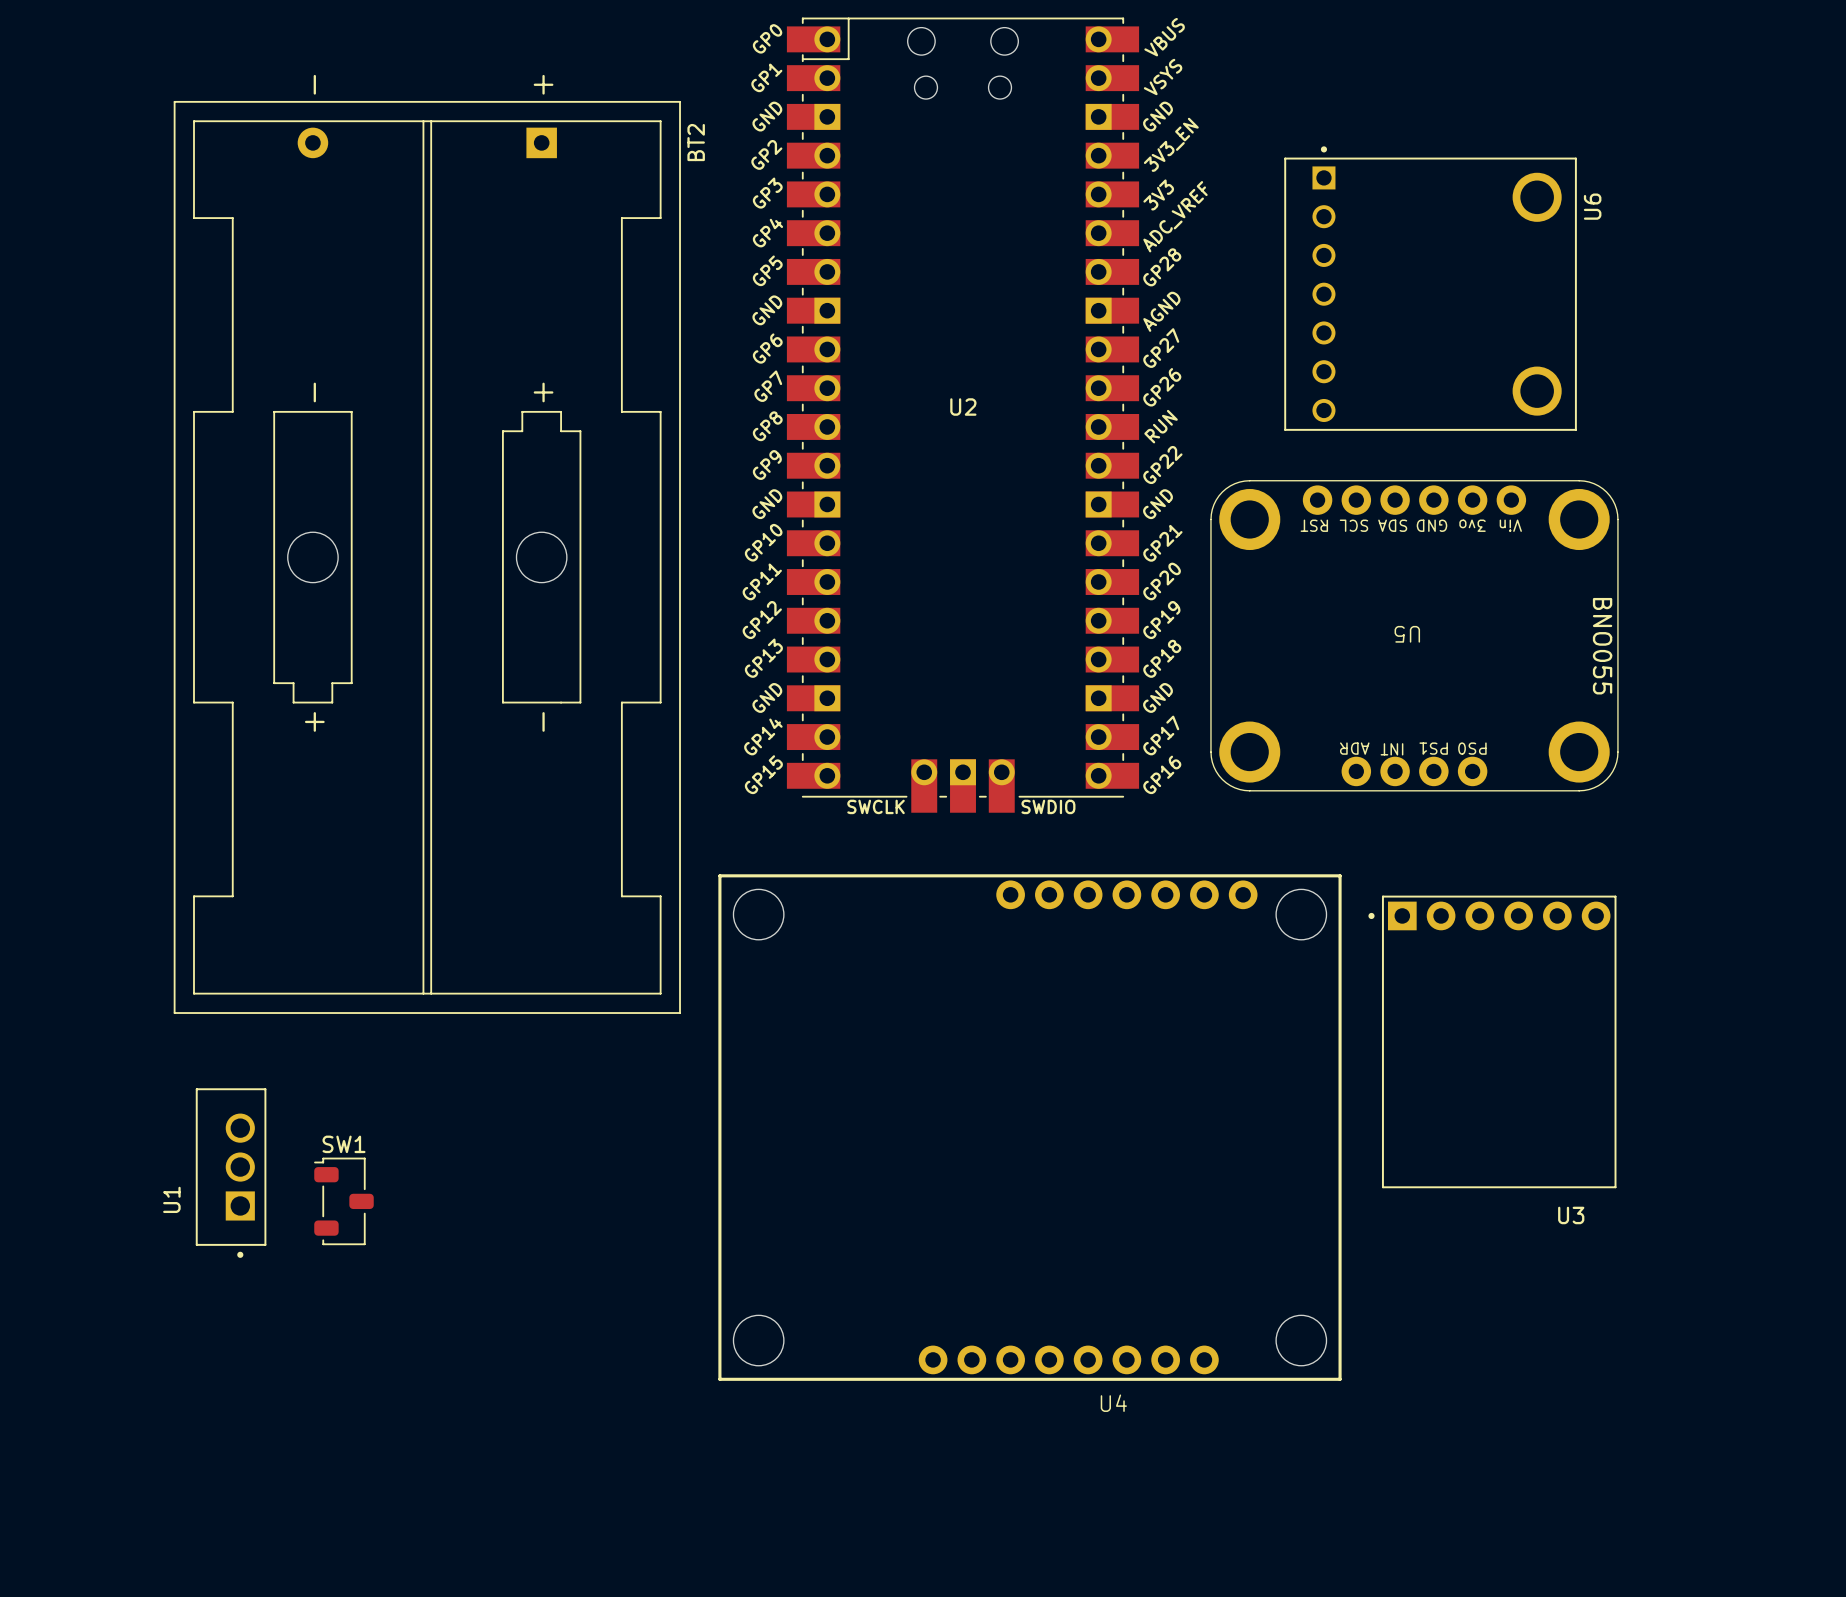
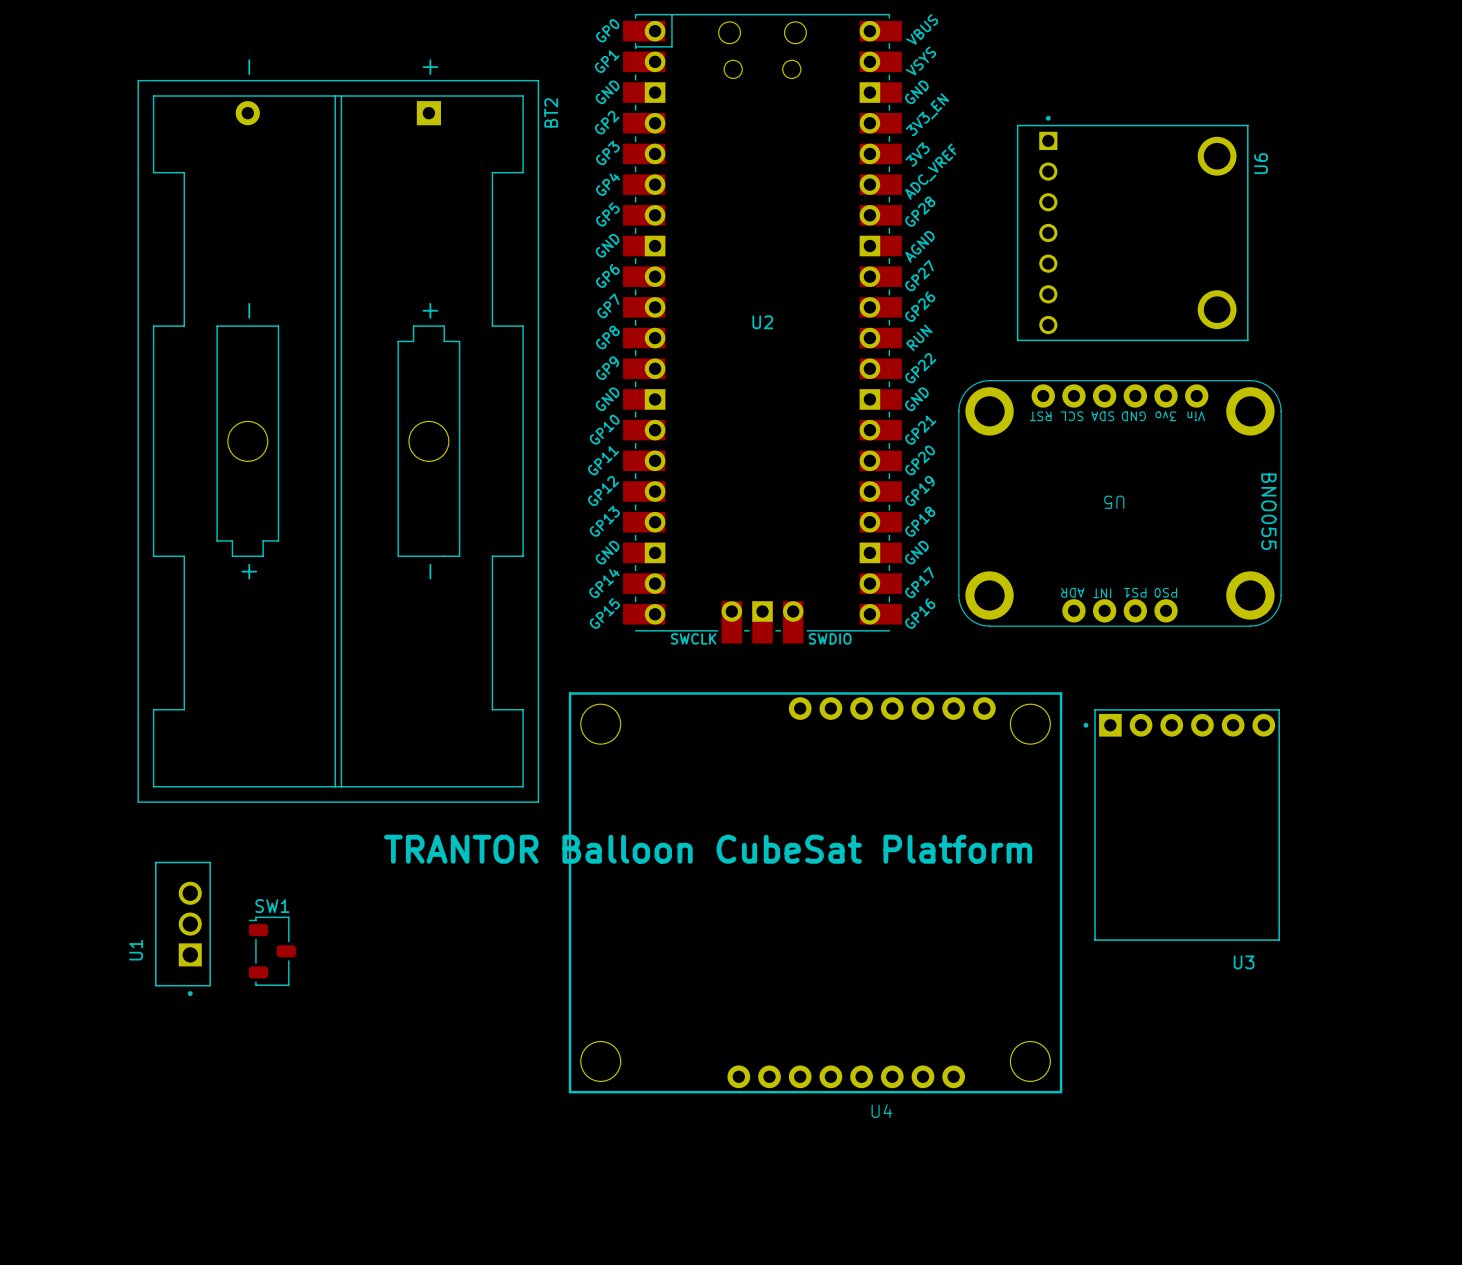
text: none -> TRANTOR Balloon CubeSat Platform (708, 849)

